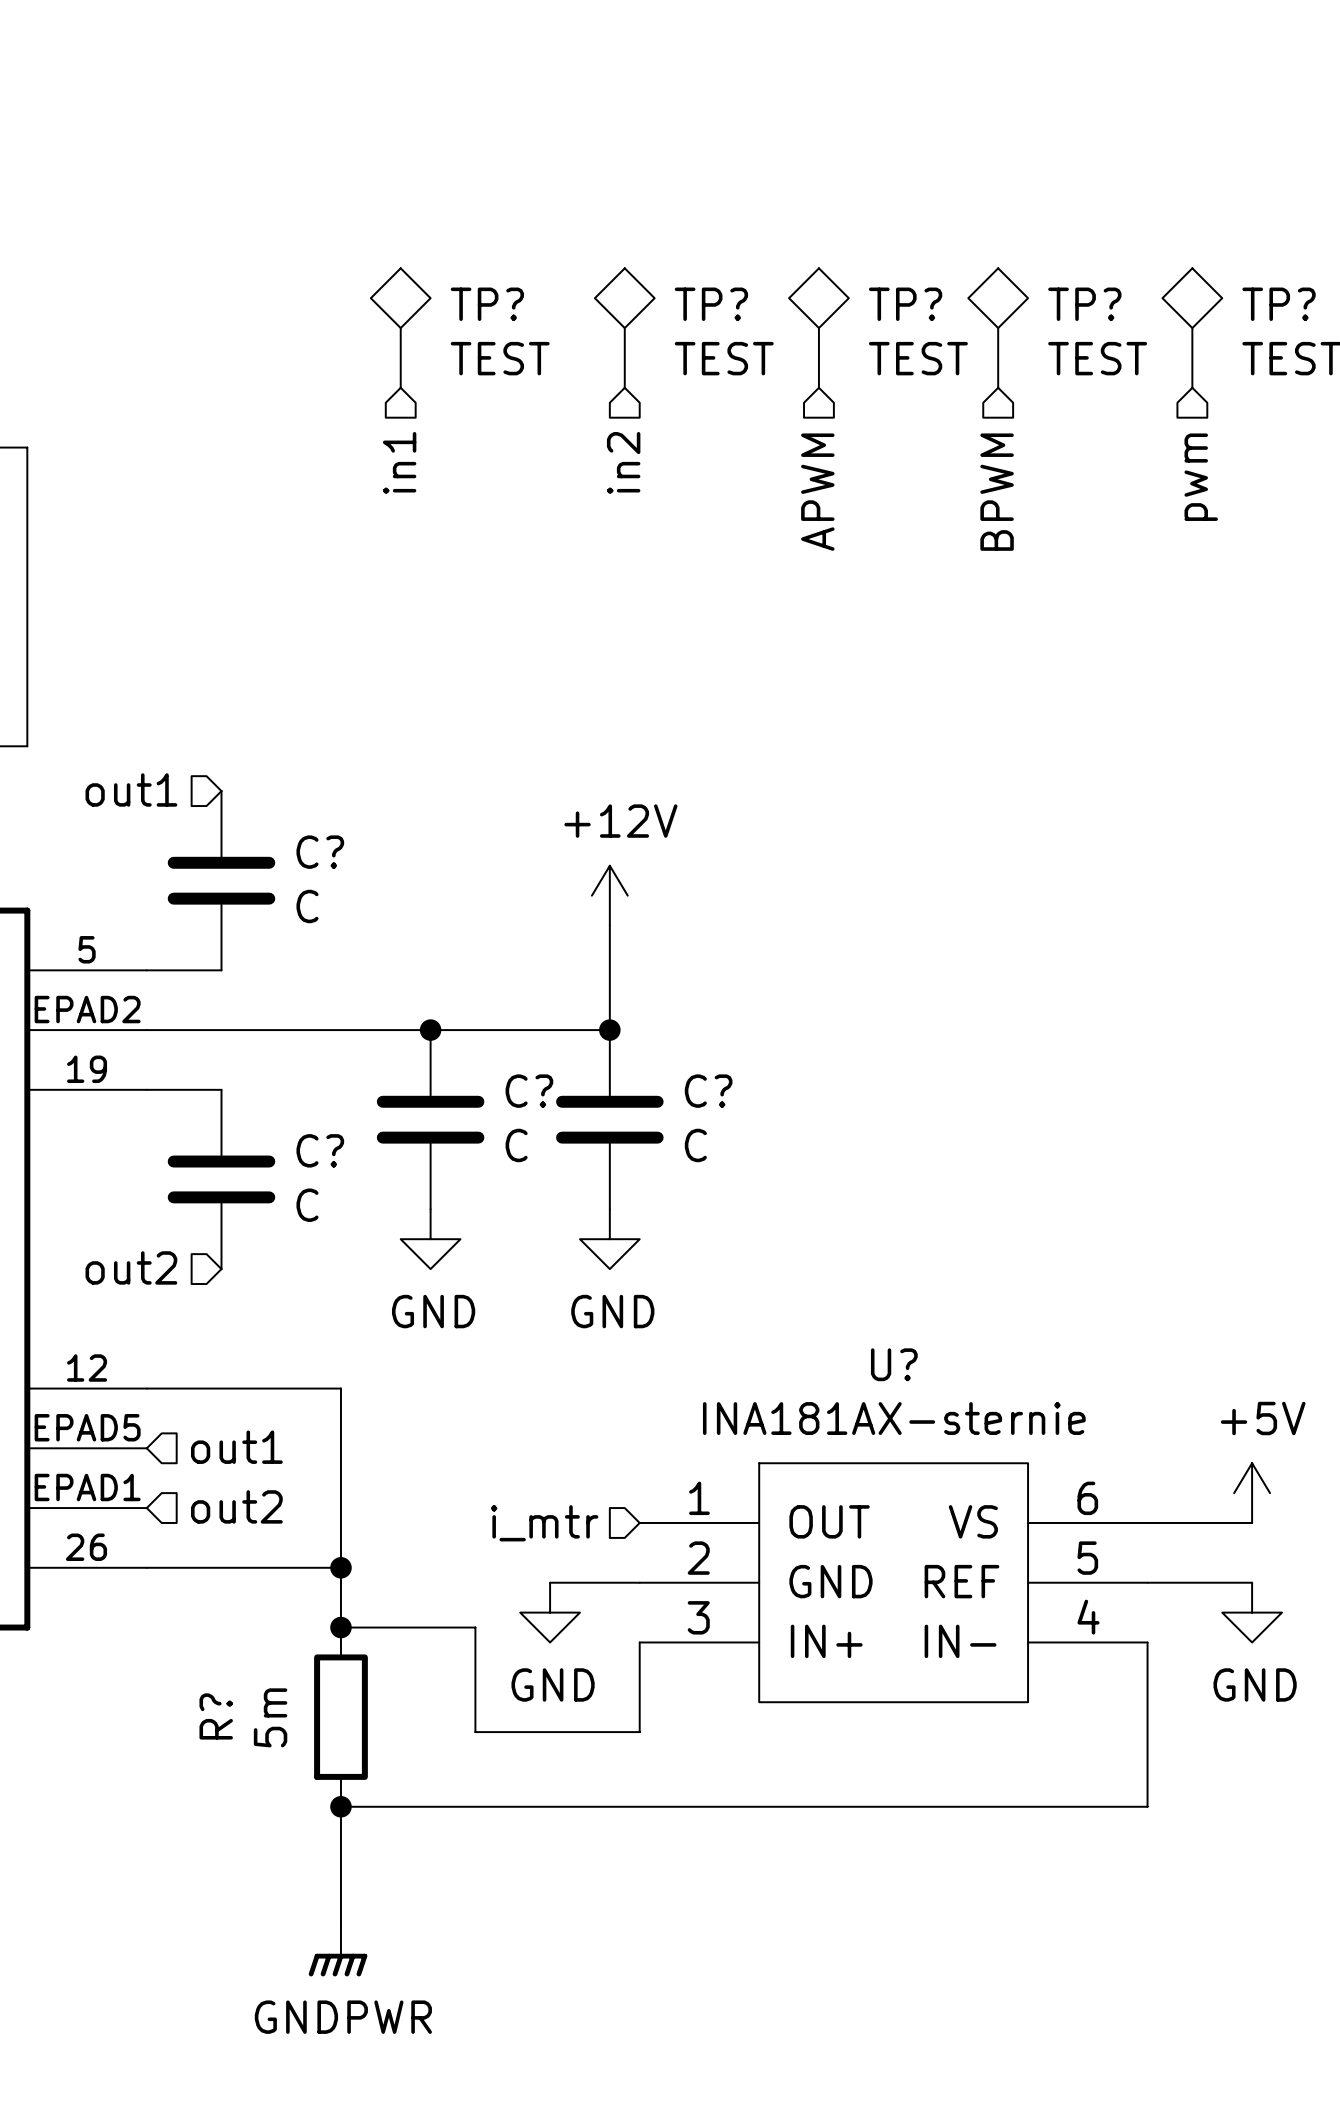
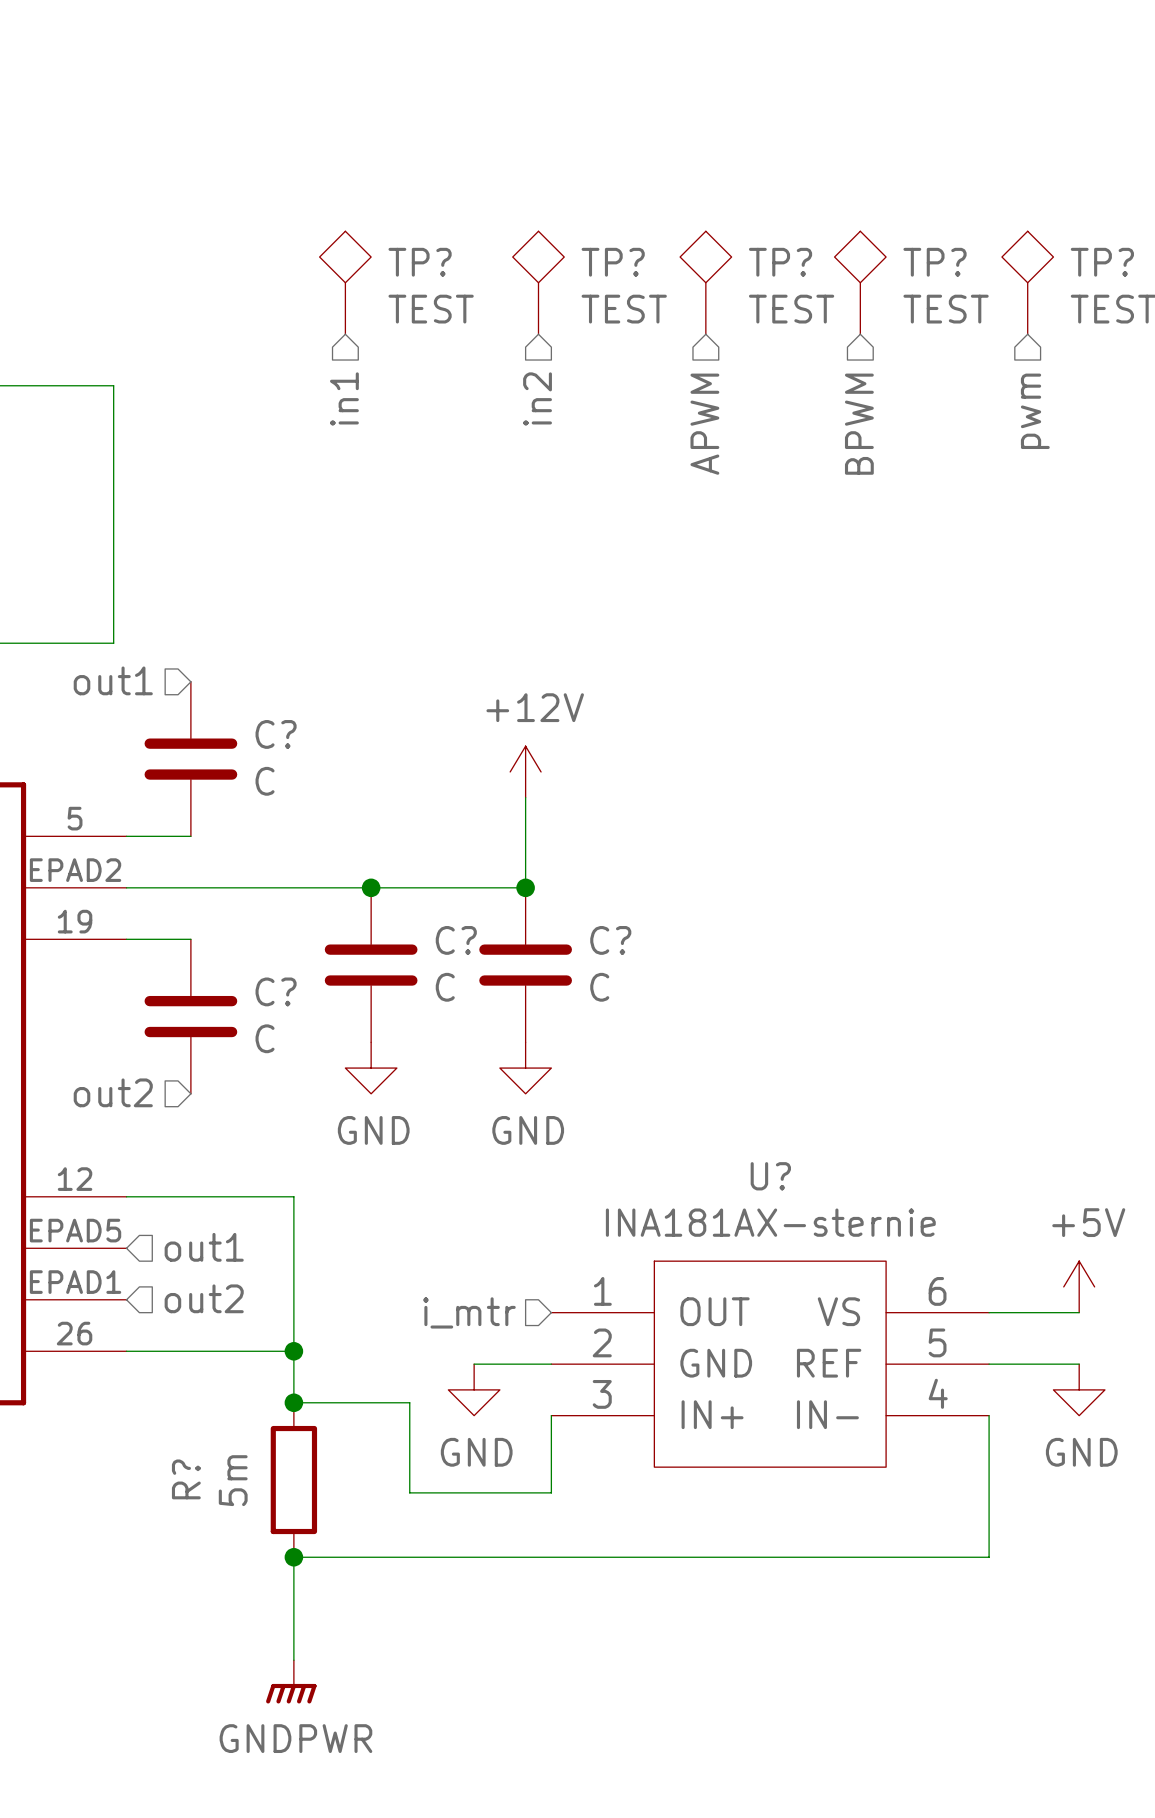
wire: (27, 447) (27, 746) -> (23, 385) (113, 385) (113, 643) (23, 643)

